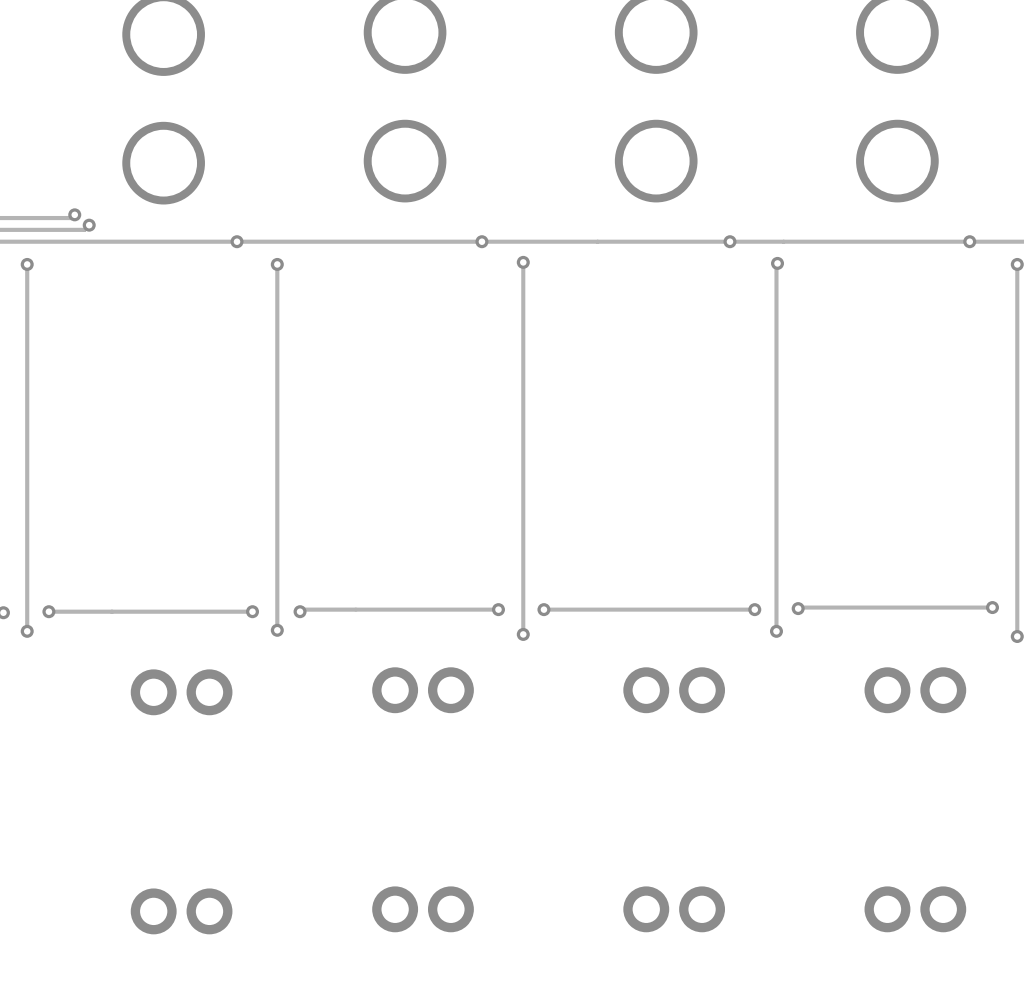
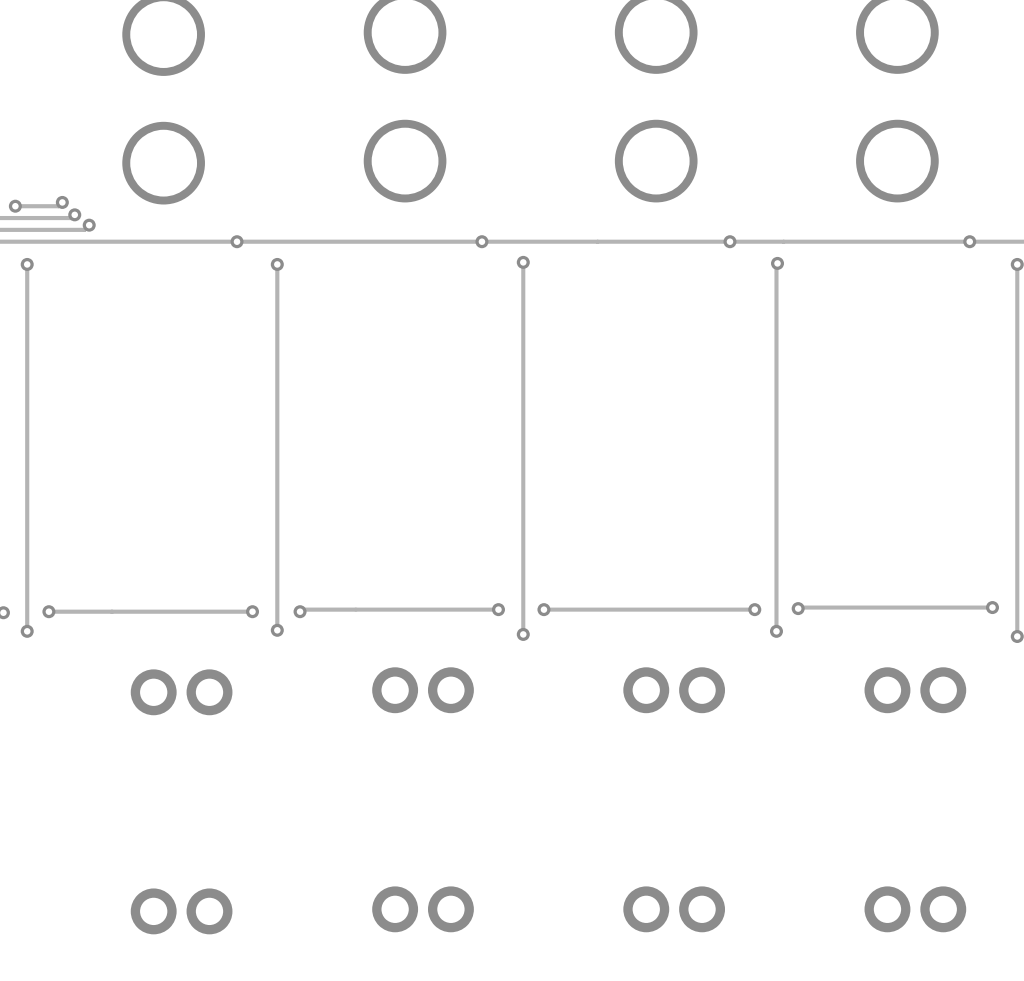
track: none -> (62, 202) (58, 206) (15, 206)
via: none -> (62, 202)
via: none -> (15, 206)

